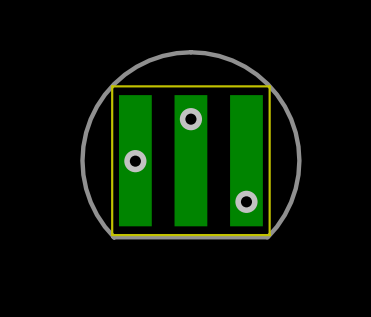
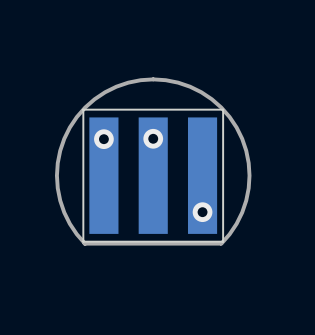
via position: (135, 161) -> (103, 139)

